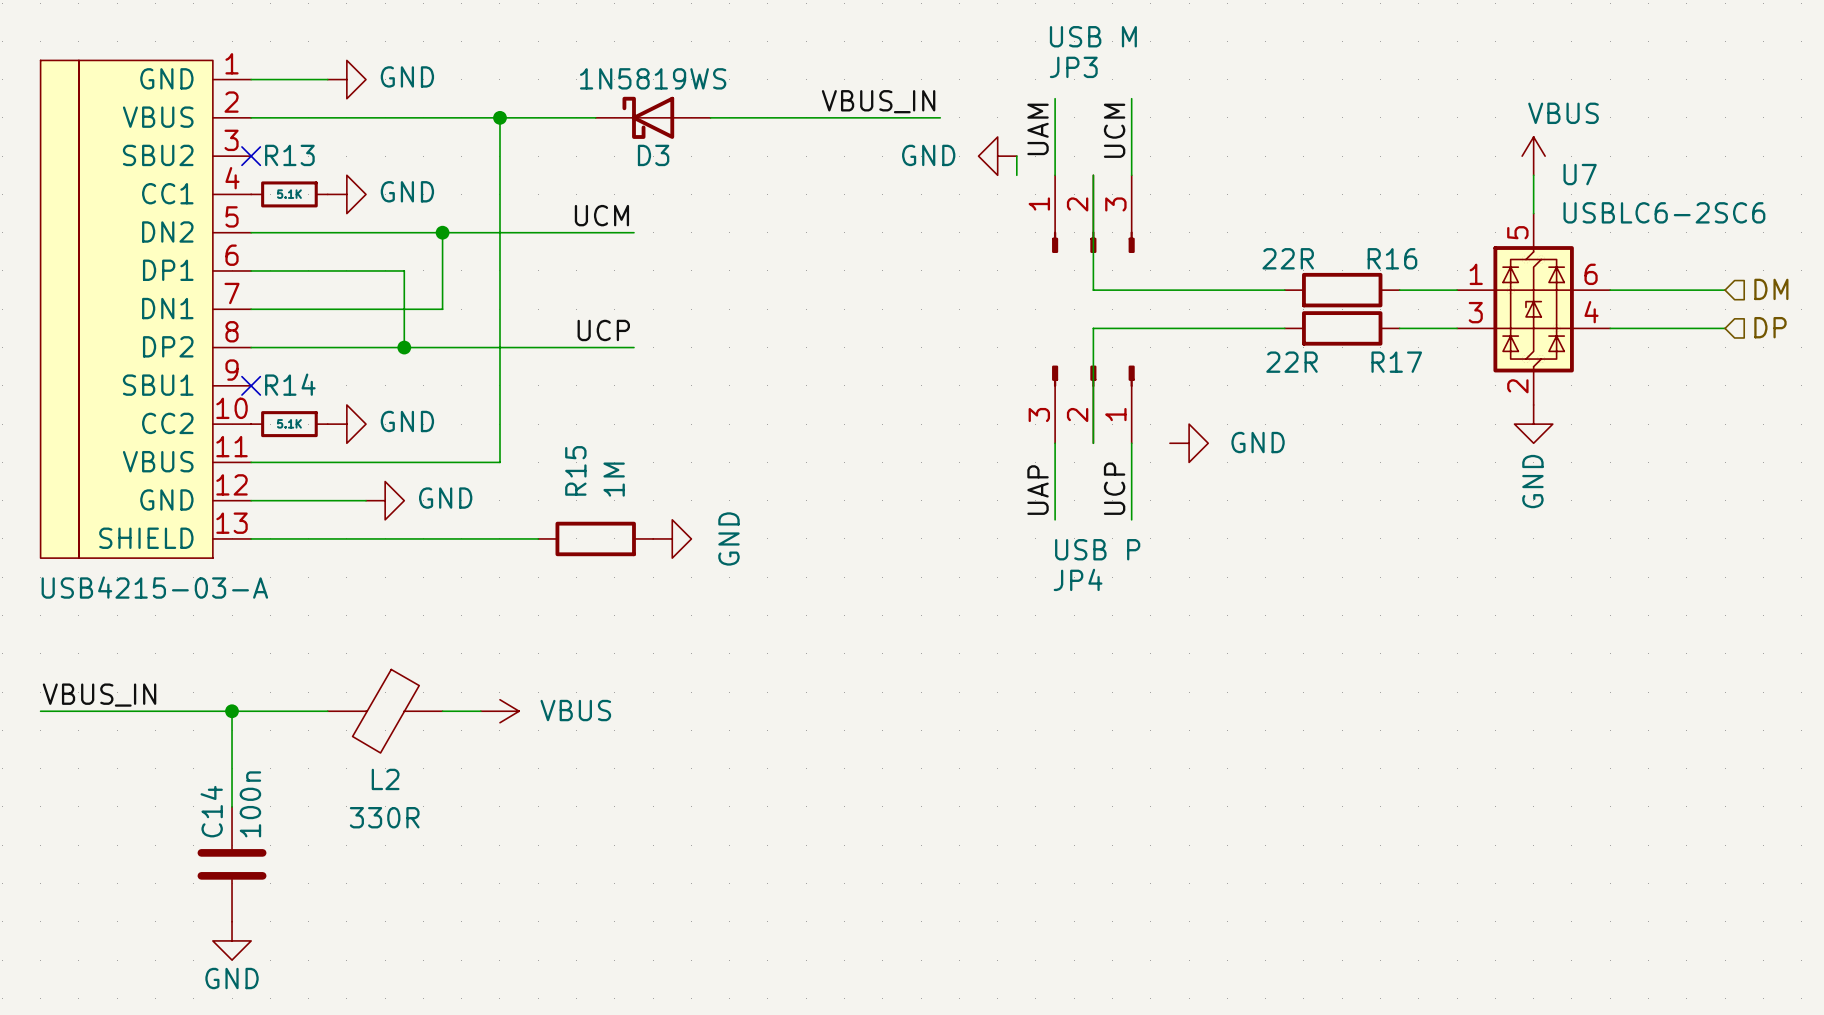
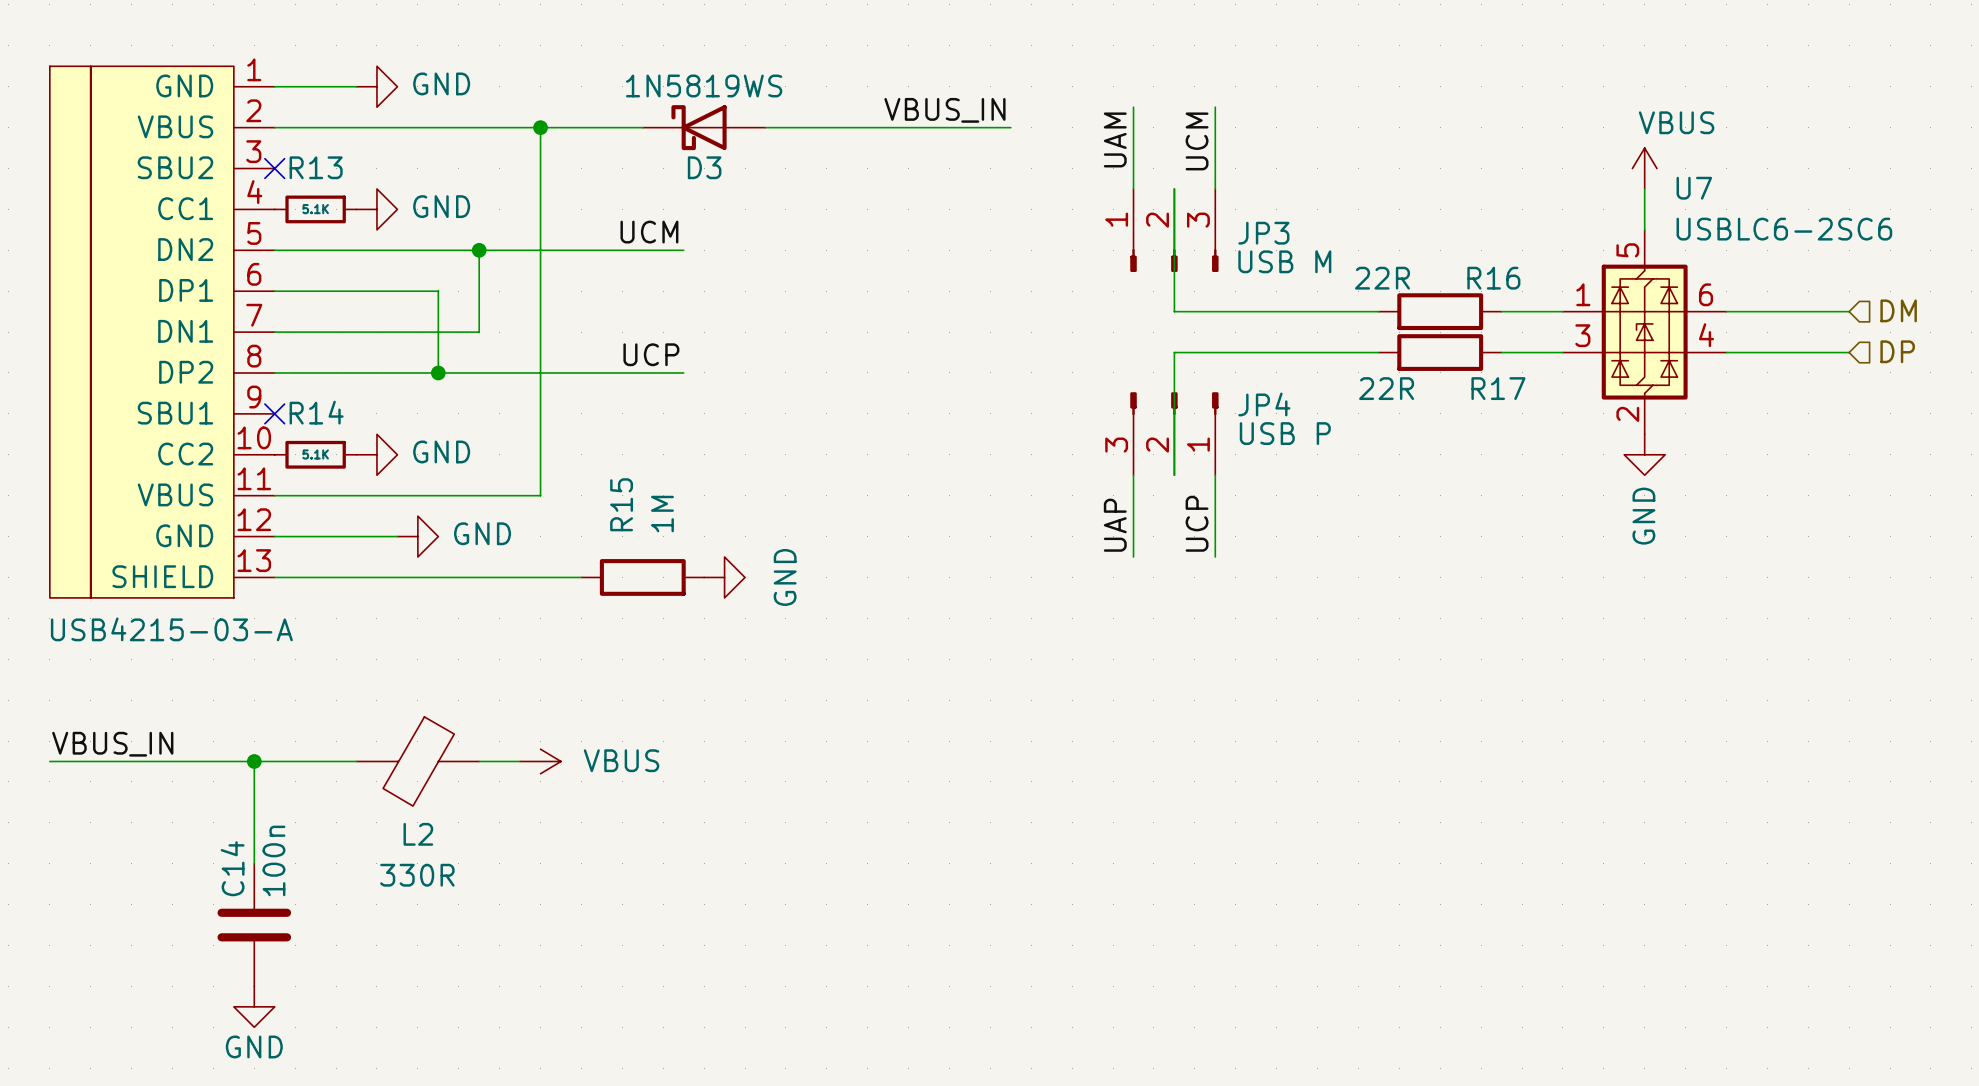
JP3 value position: USB M (1093, 36) -> USB M (1284, 261)
JP3 name position: JP3 (1073, 67) -> JP3 (1263, 233)
power symbol: GND (997, 156) -> none
wire: (1016, 156) (1016, 175) -> none
power symbol: GND (1189, 443) -> none
JP4 value position: USB P (1097, 549) -> USB P (1285, 433)
JP4 name position: JP4 (1078, 579) -> JP4 (1264, 404)

